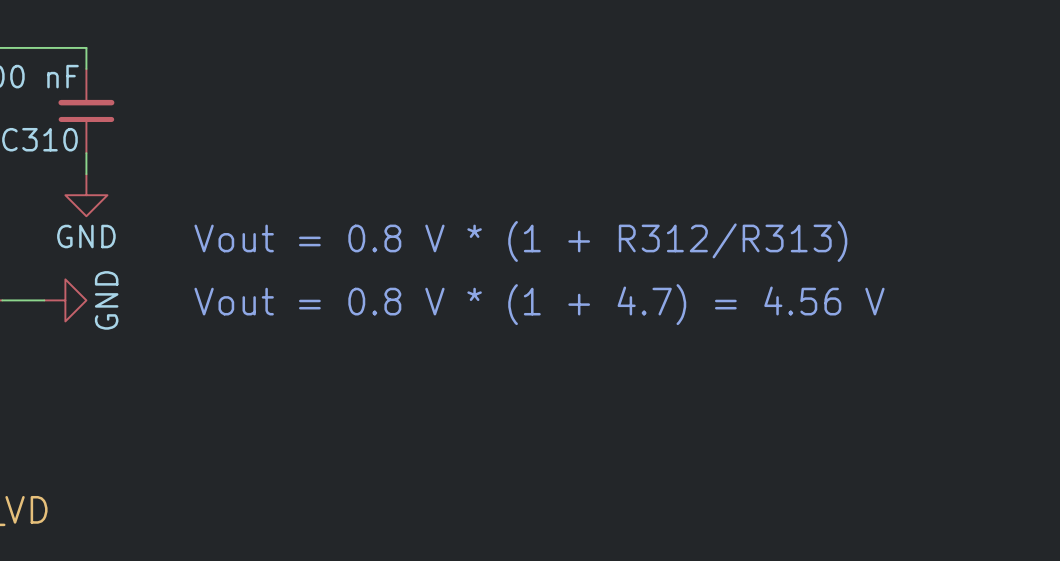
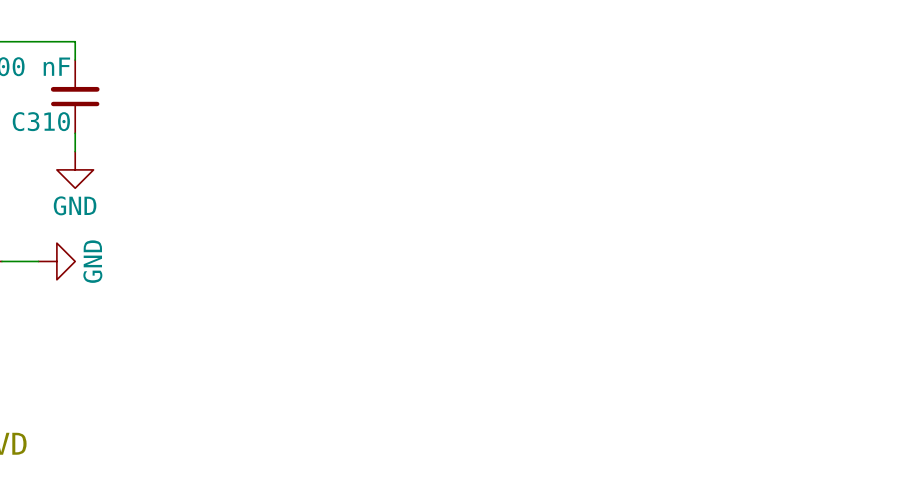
text: Vout = 0.8 V * (1 + R312/R313) (520, 241) -> none
text: Vout = 0.8 V * (1 + 4.7) = 4.56 V (539, 304) -> none

